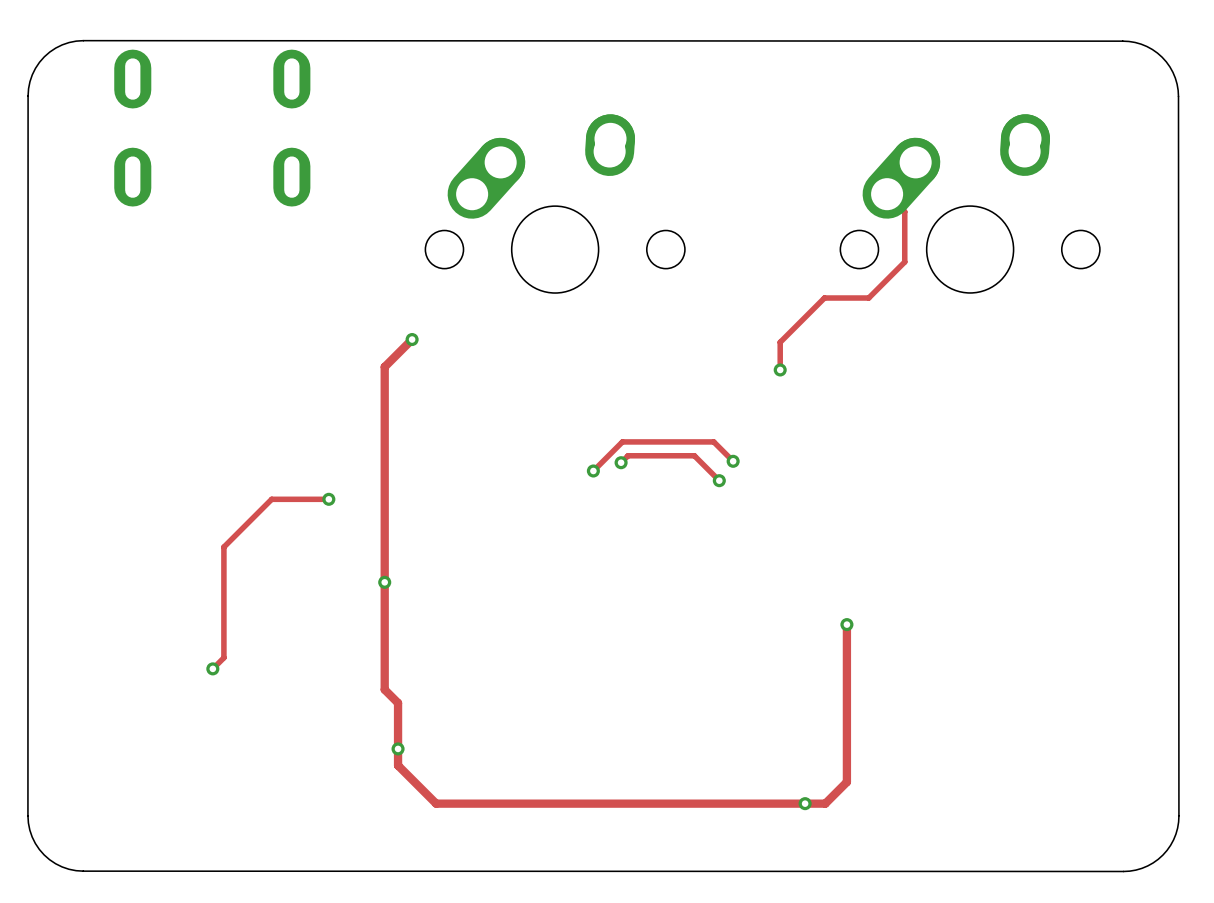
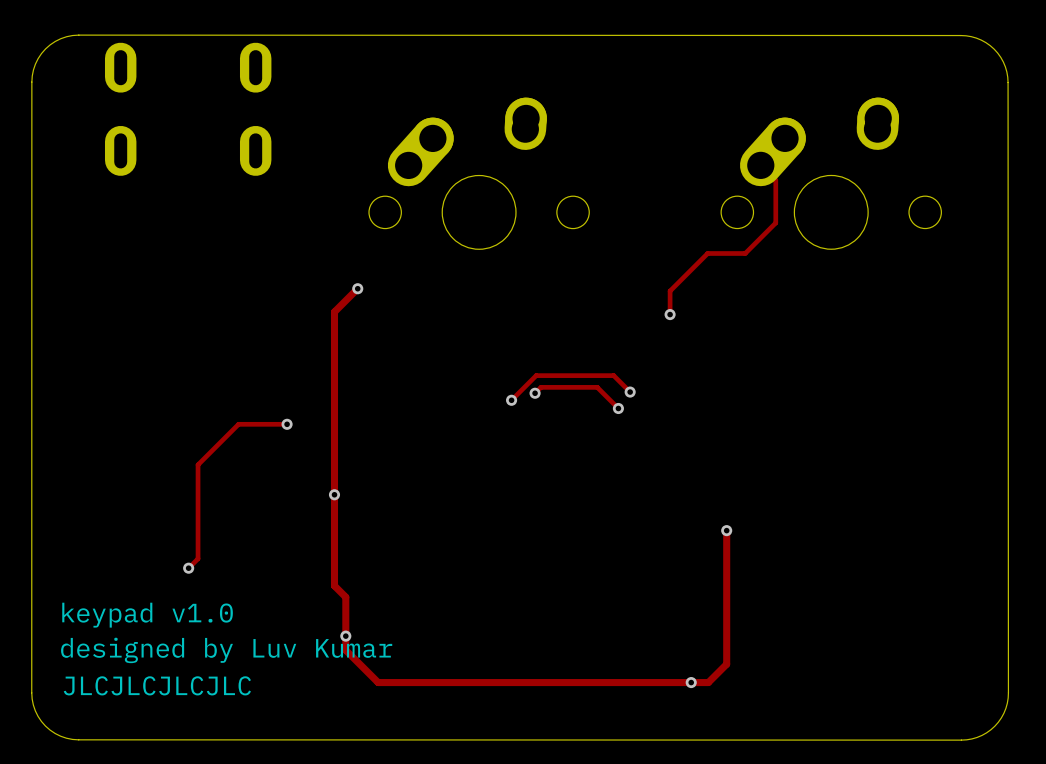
text: none -> keypad v1.0 (147, 615)
text: none -> designed by Luv Kumar (226, 650)
text: none -> JLCJLCJLCJLC (157, 685)

